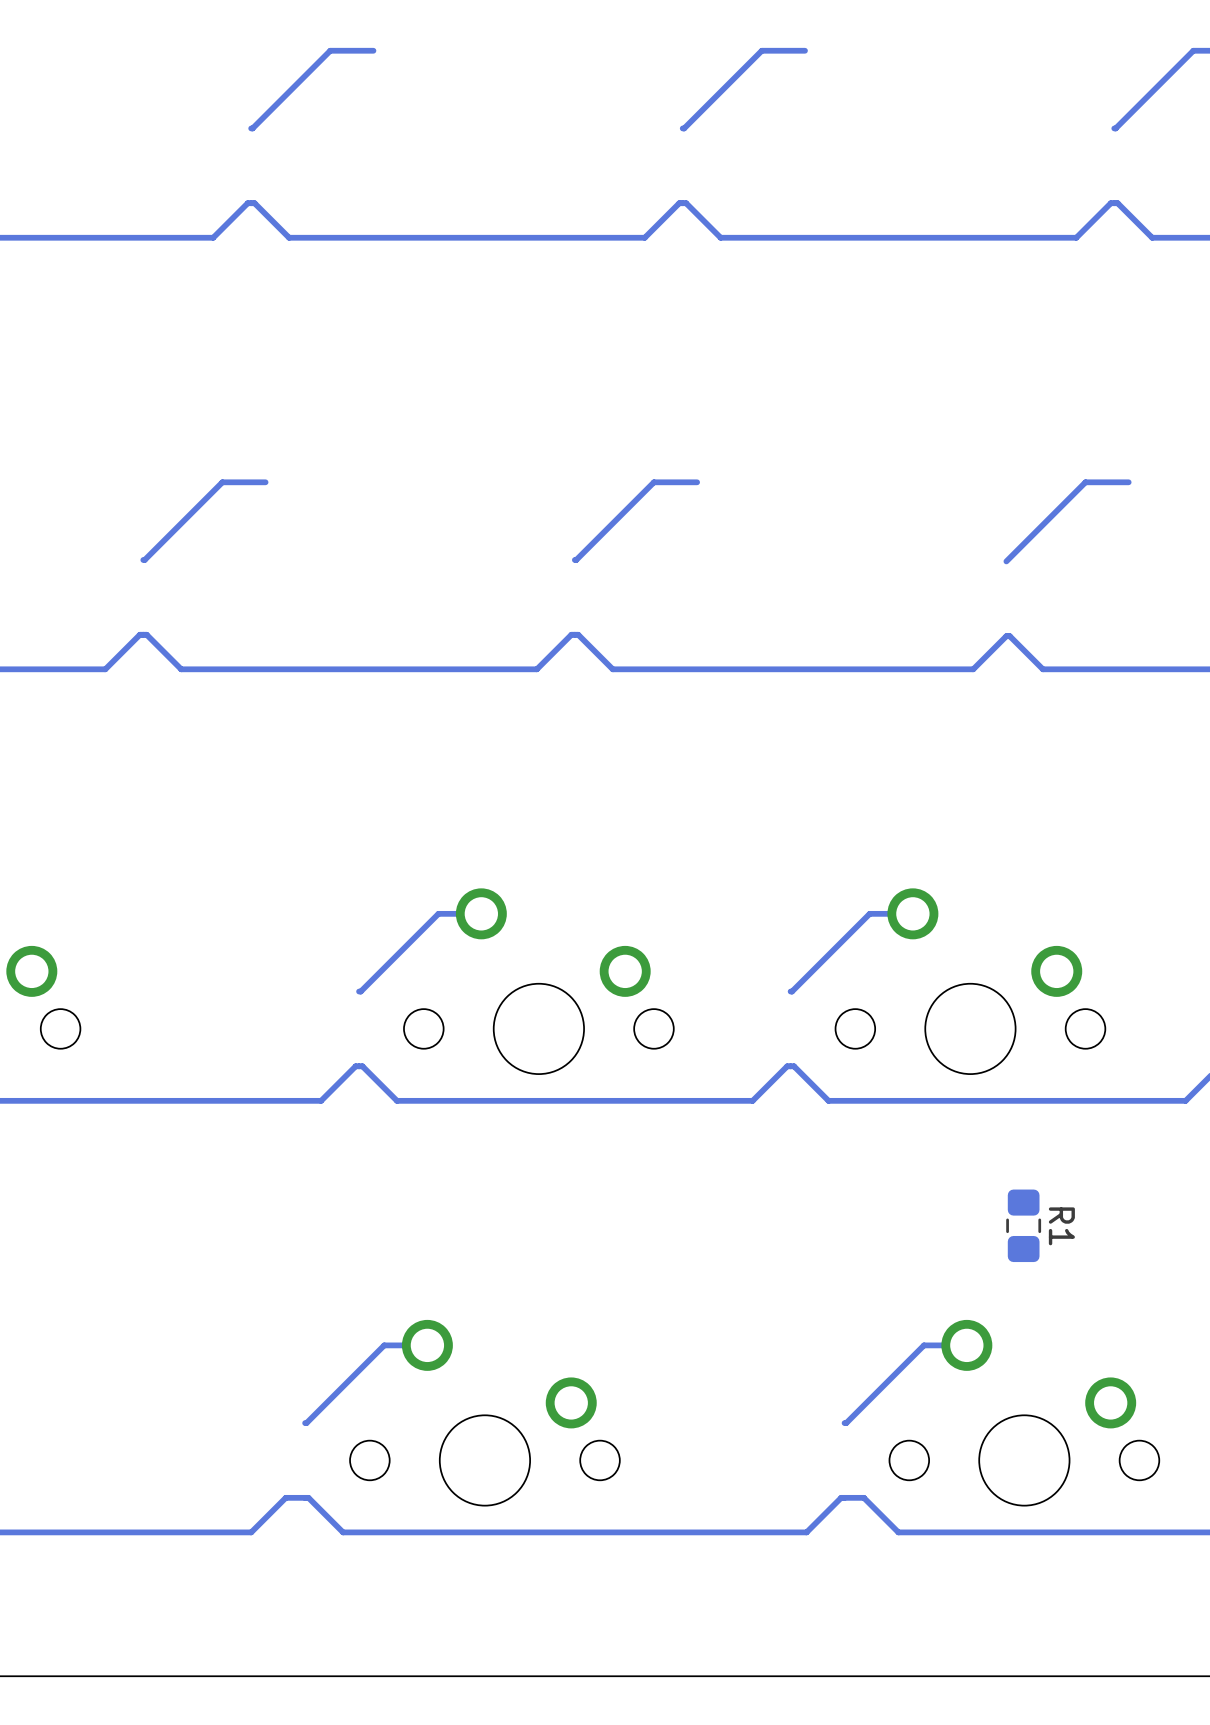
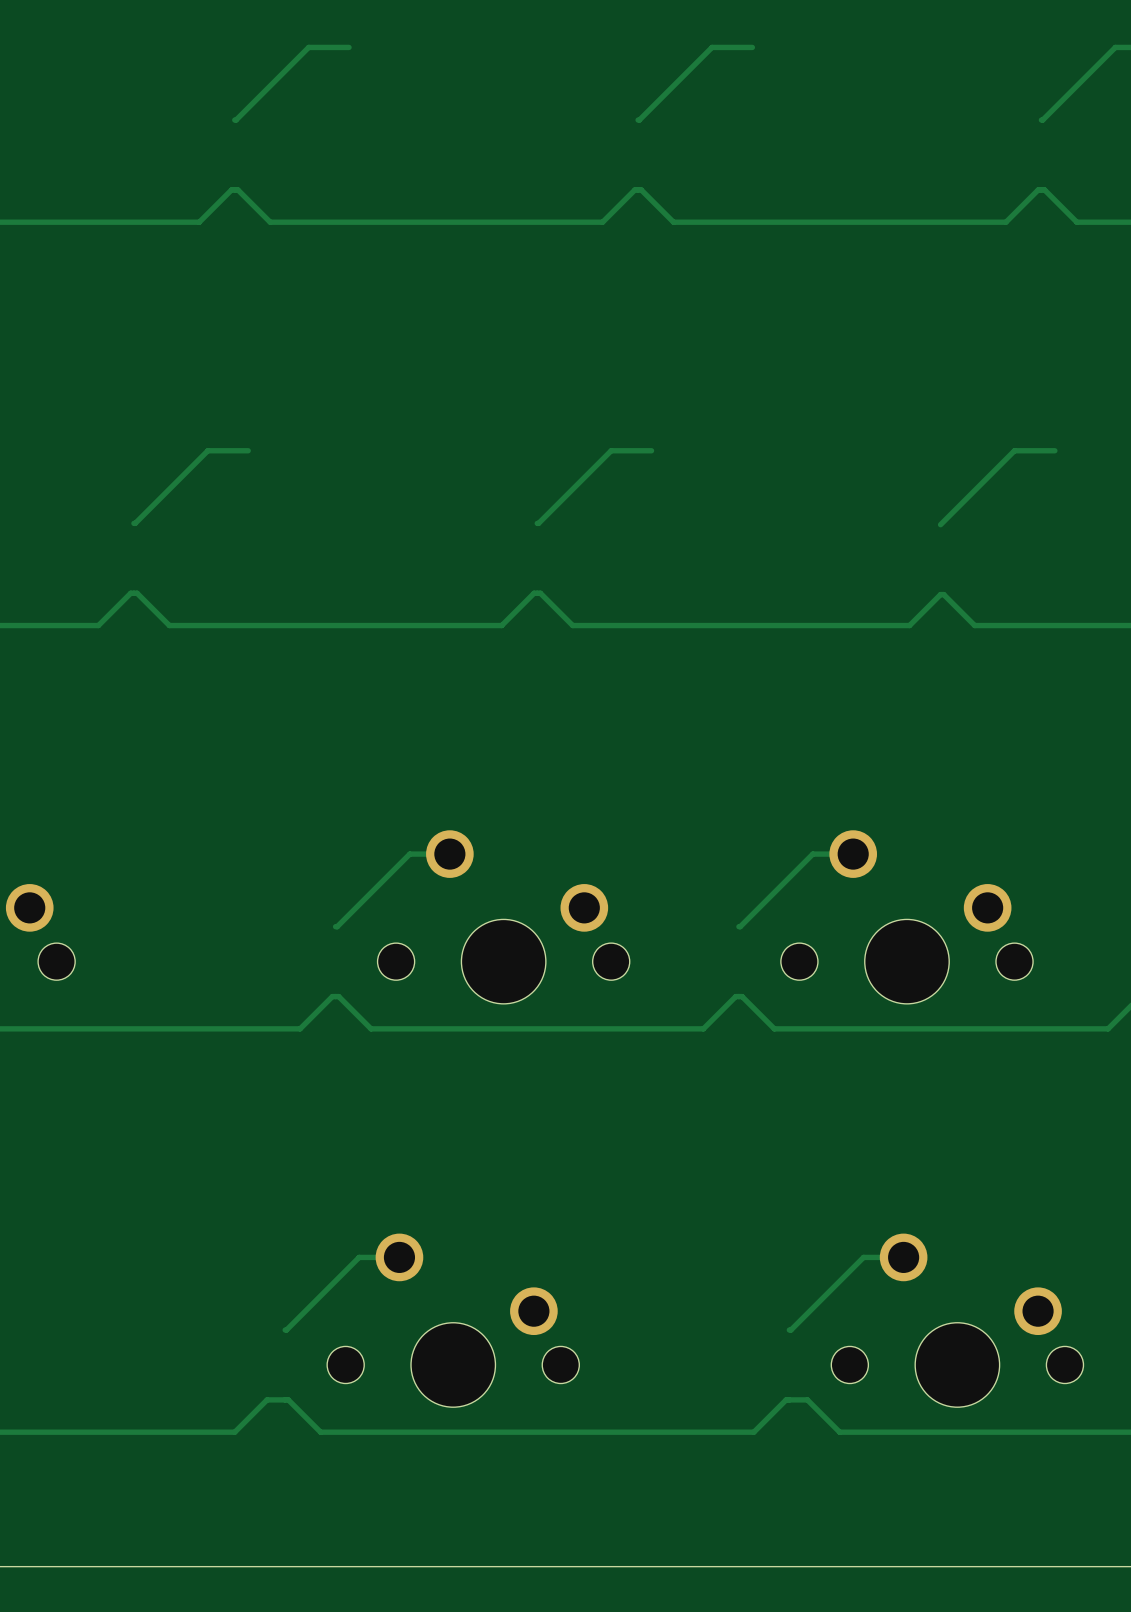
R1: (1023, 1225) -> none

